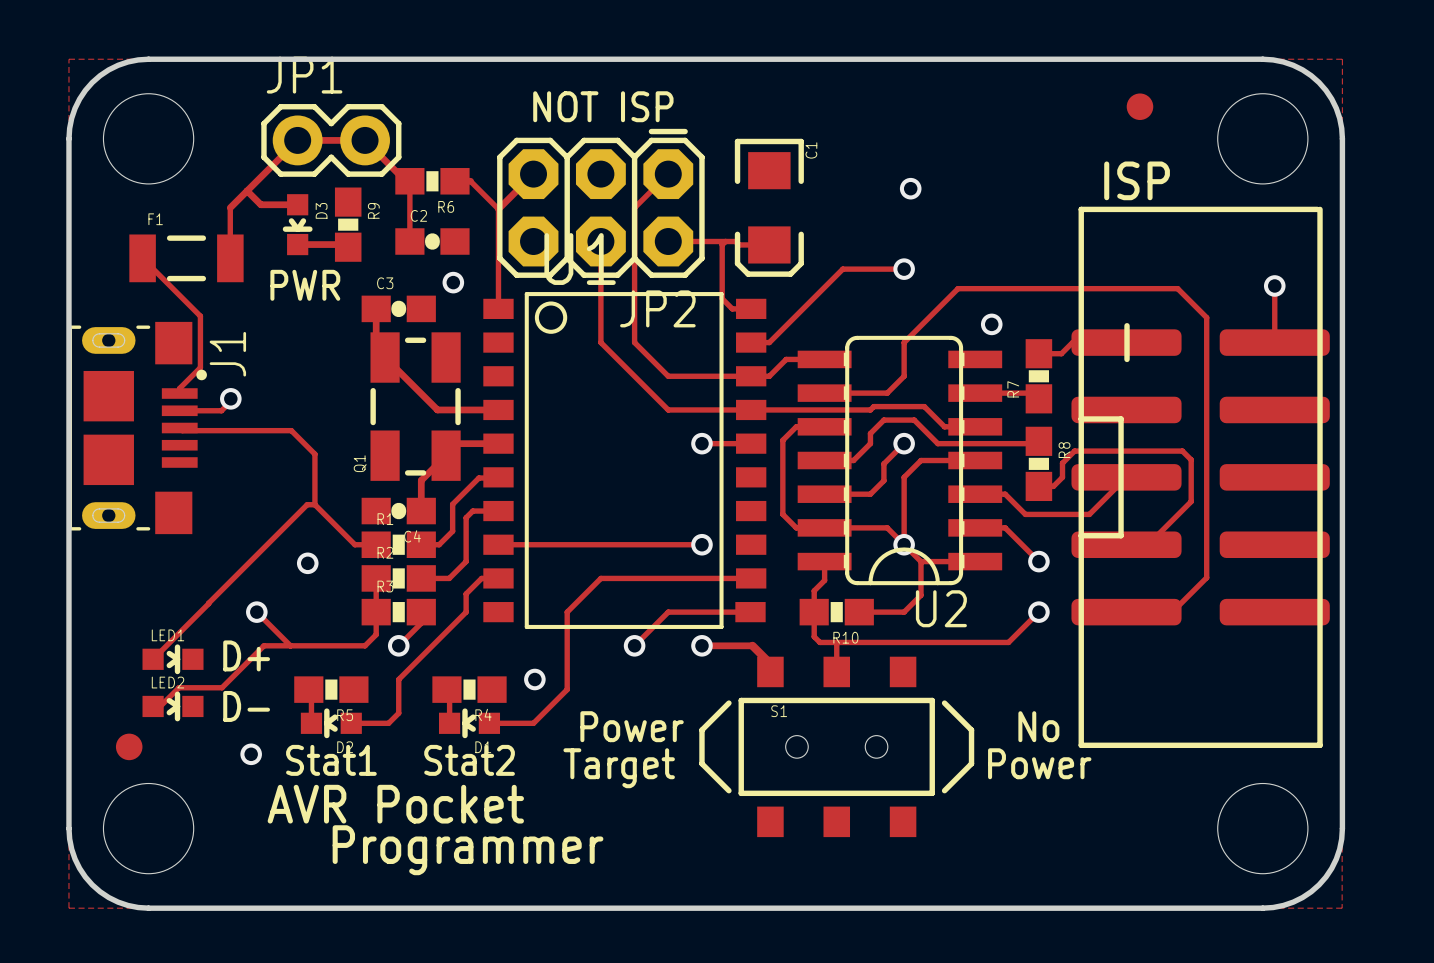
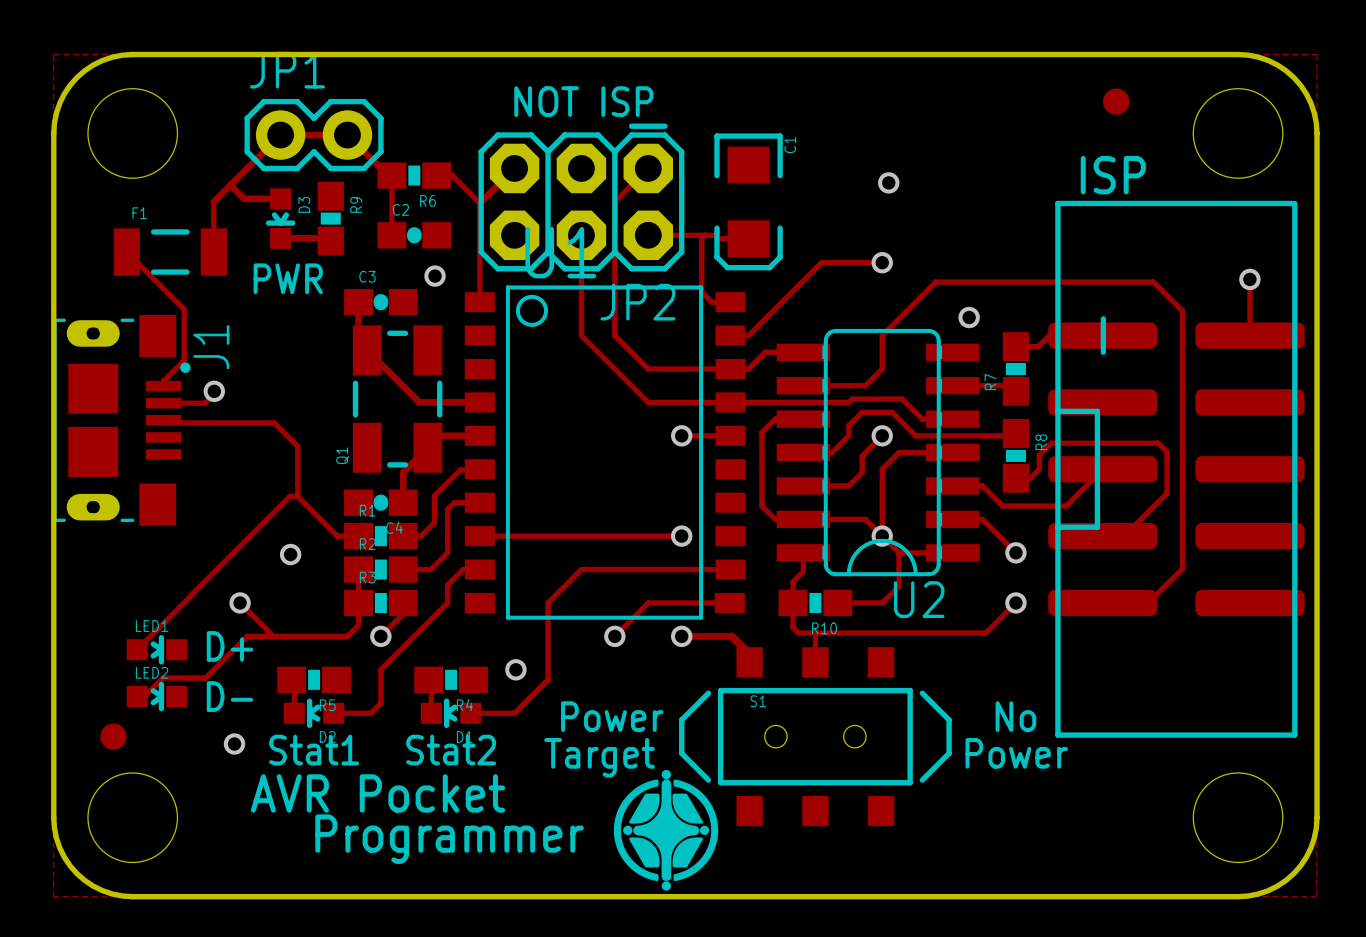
drawing: none -> [613, 769, 719, 891]

